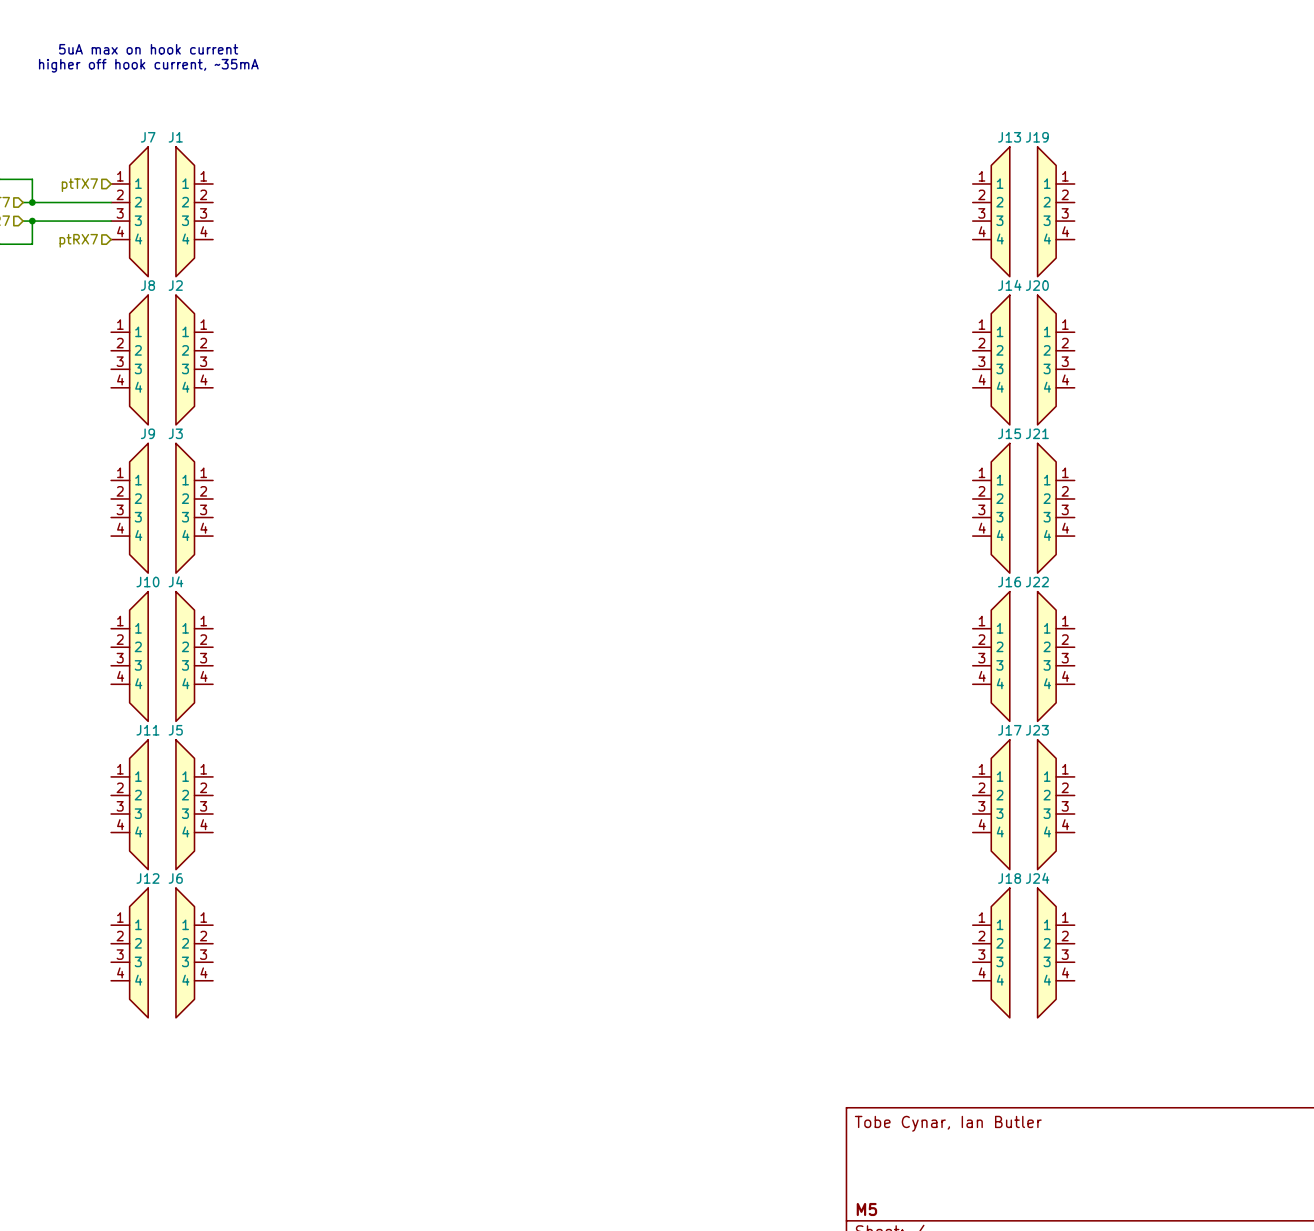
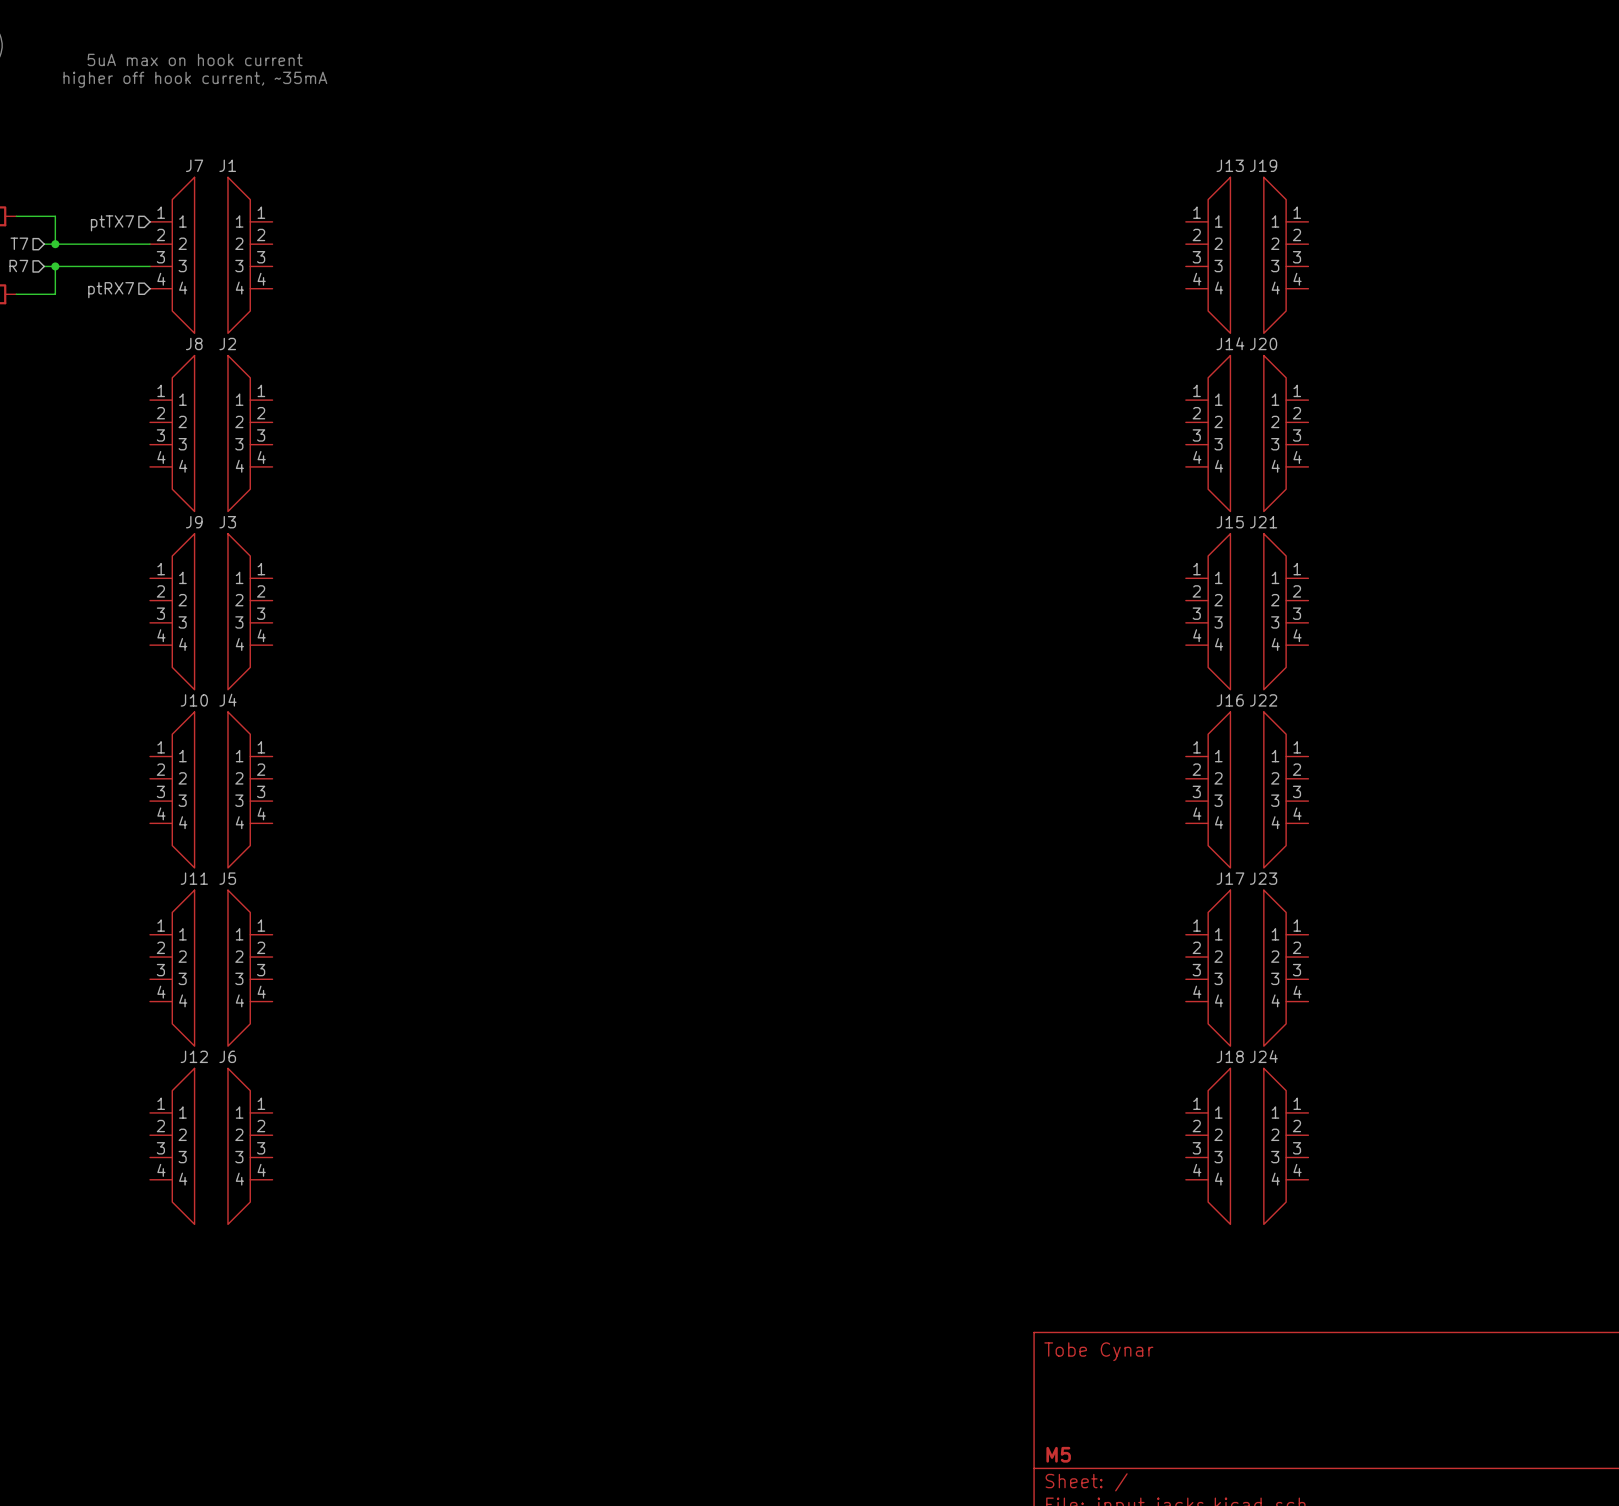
title block: Tobe Cynar, Ian Butler (948, 1123) -> Tobe Cynar (1098, 1351)

